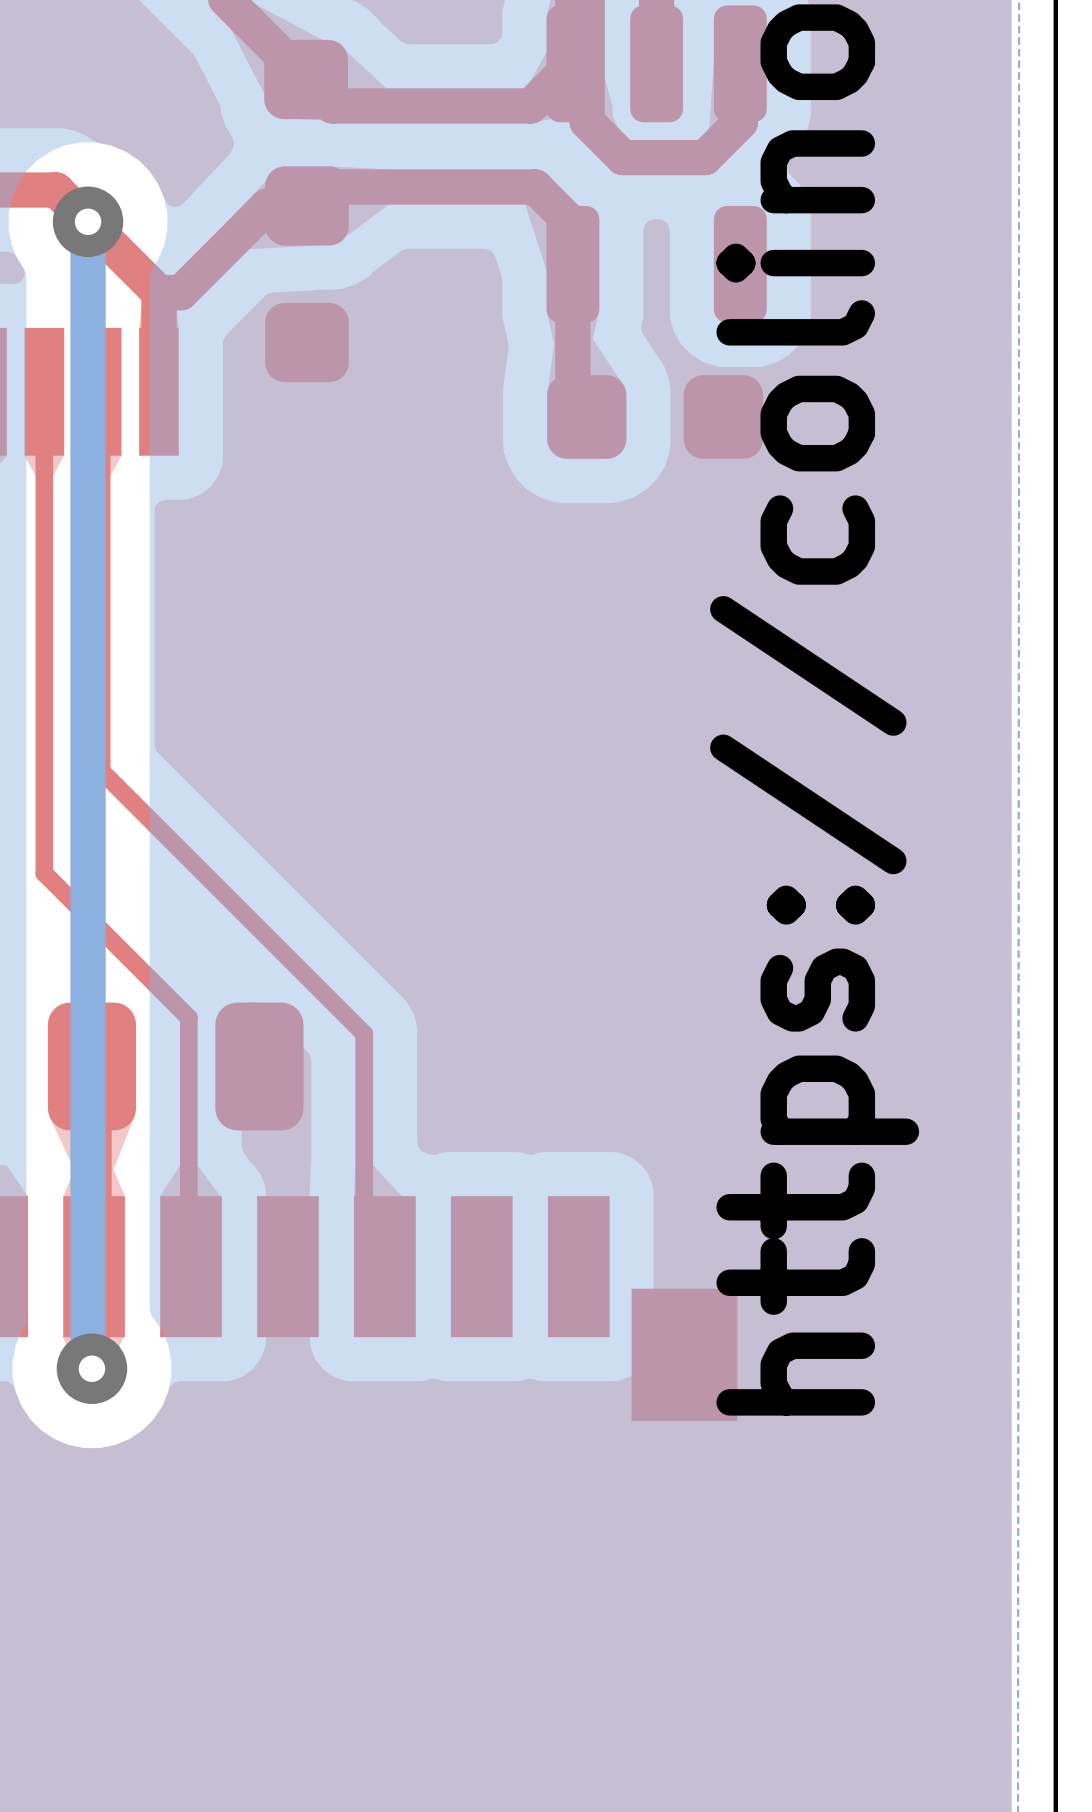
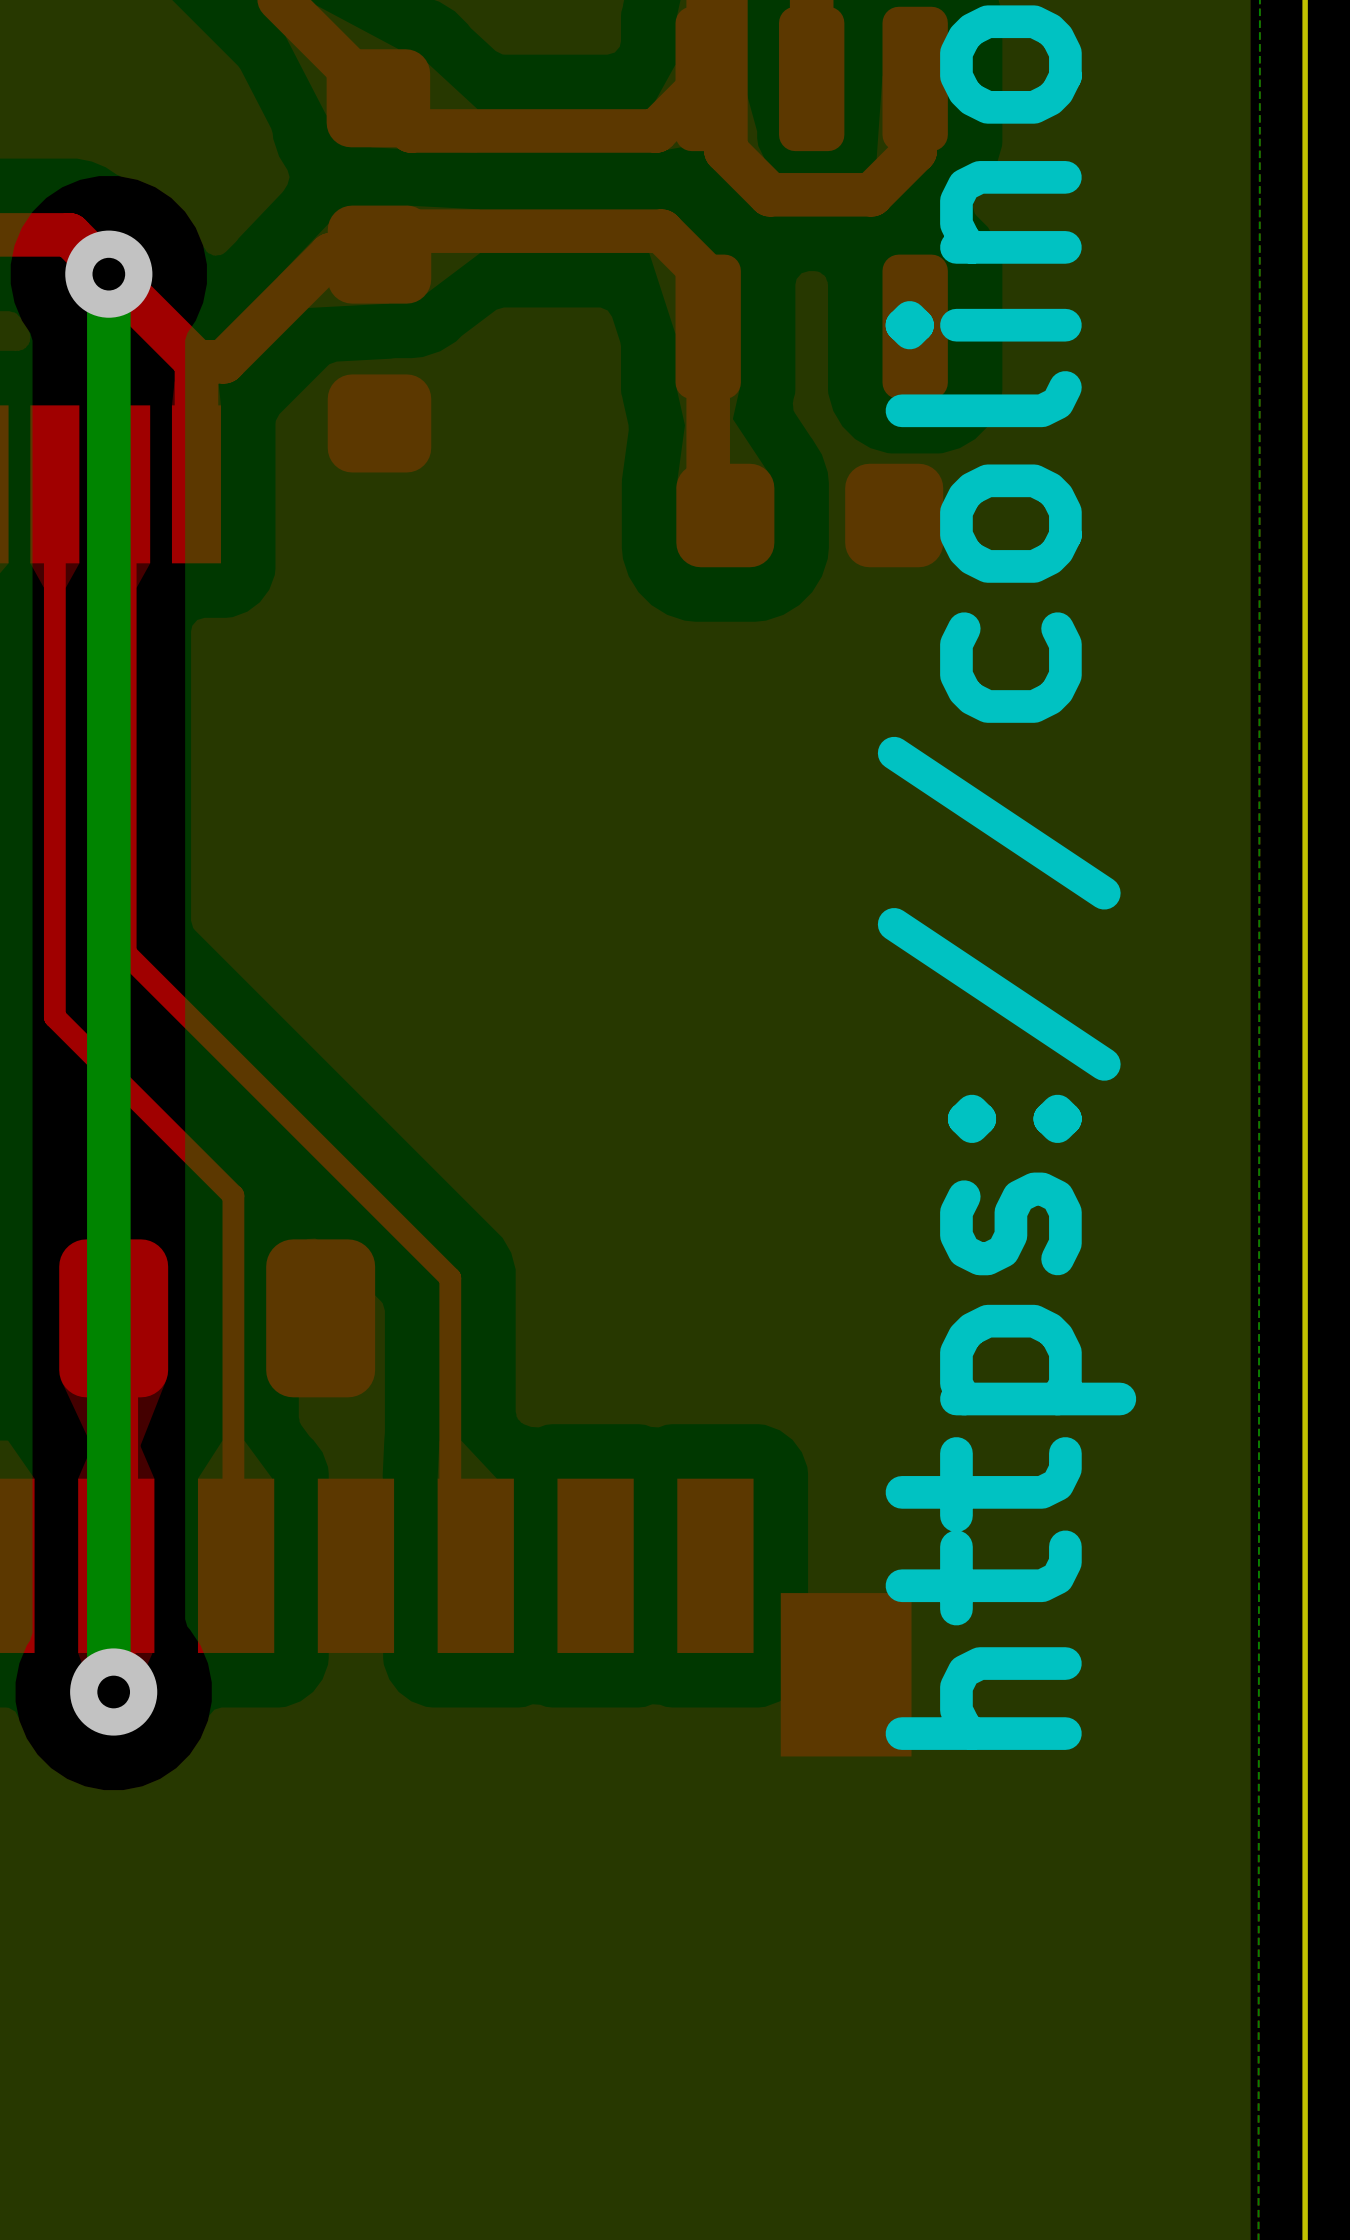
top track: (44, 822) (44, 873) (188, 1017) -> (54, 1017) (233, 1195) (233, 1258)

